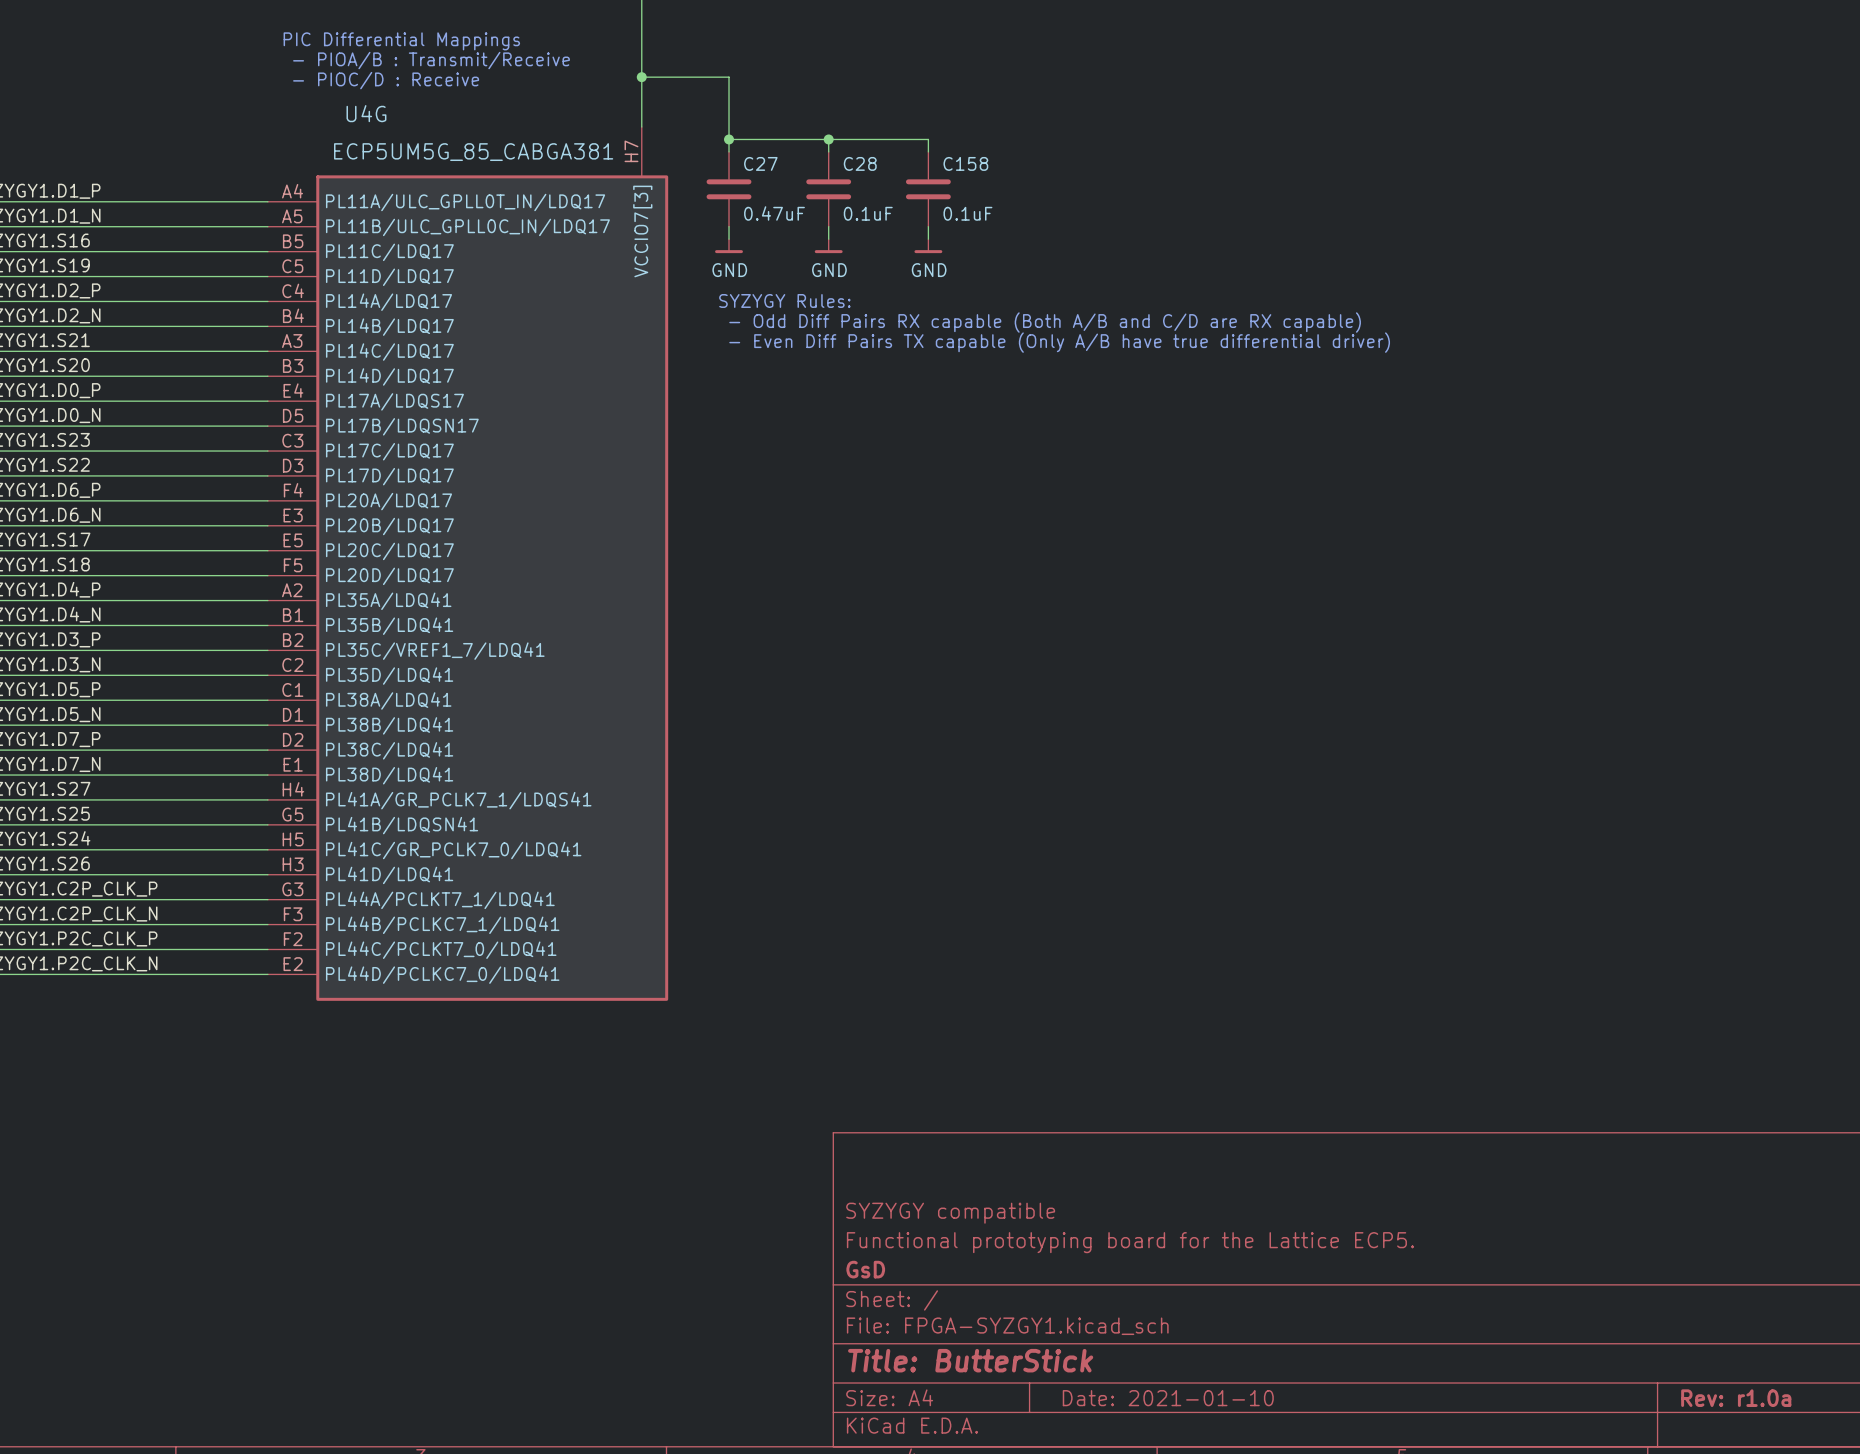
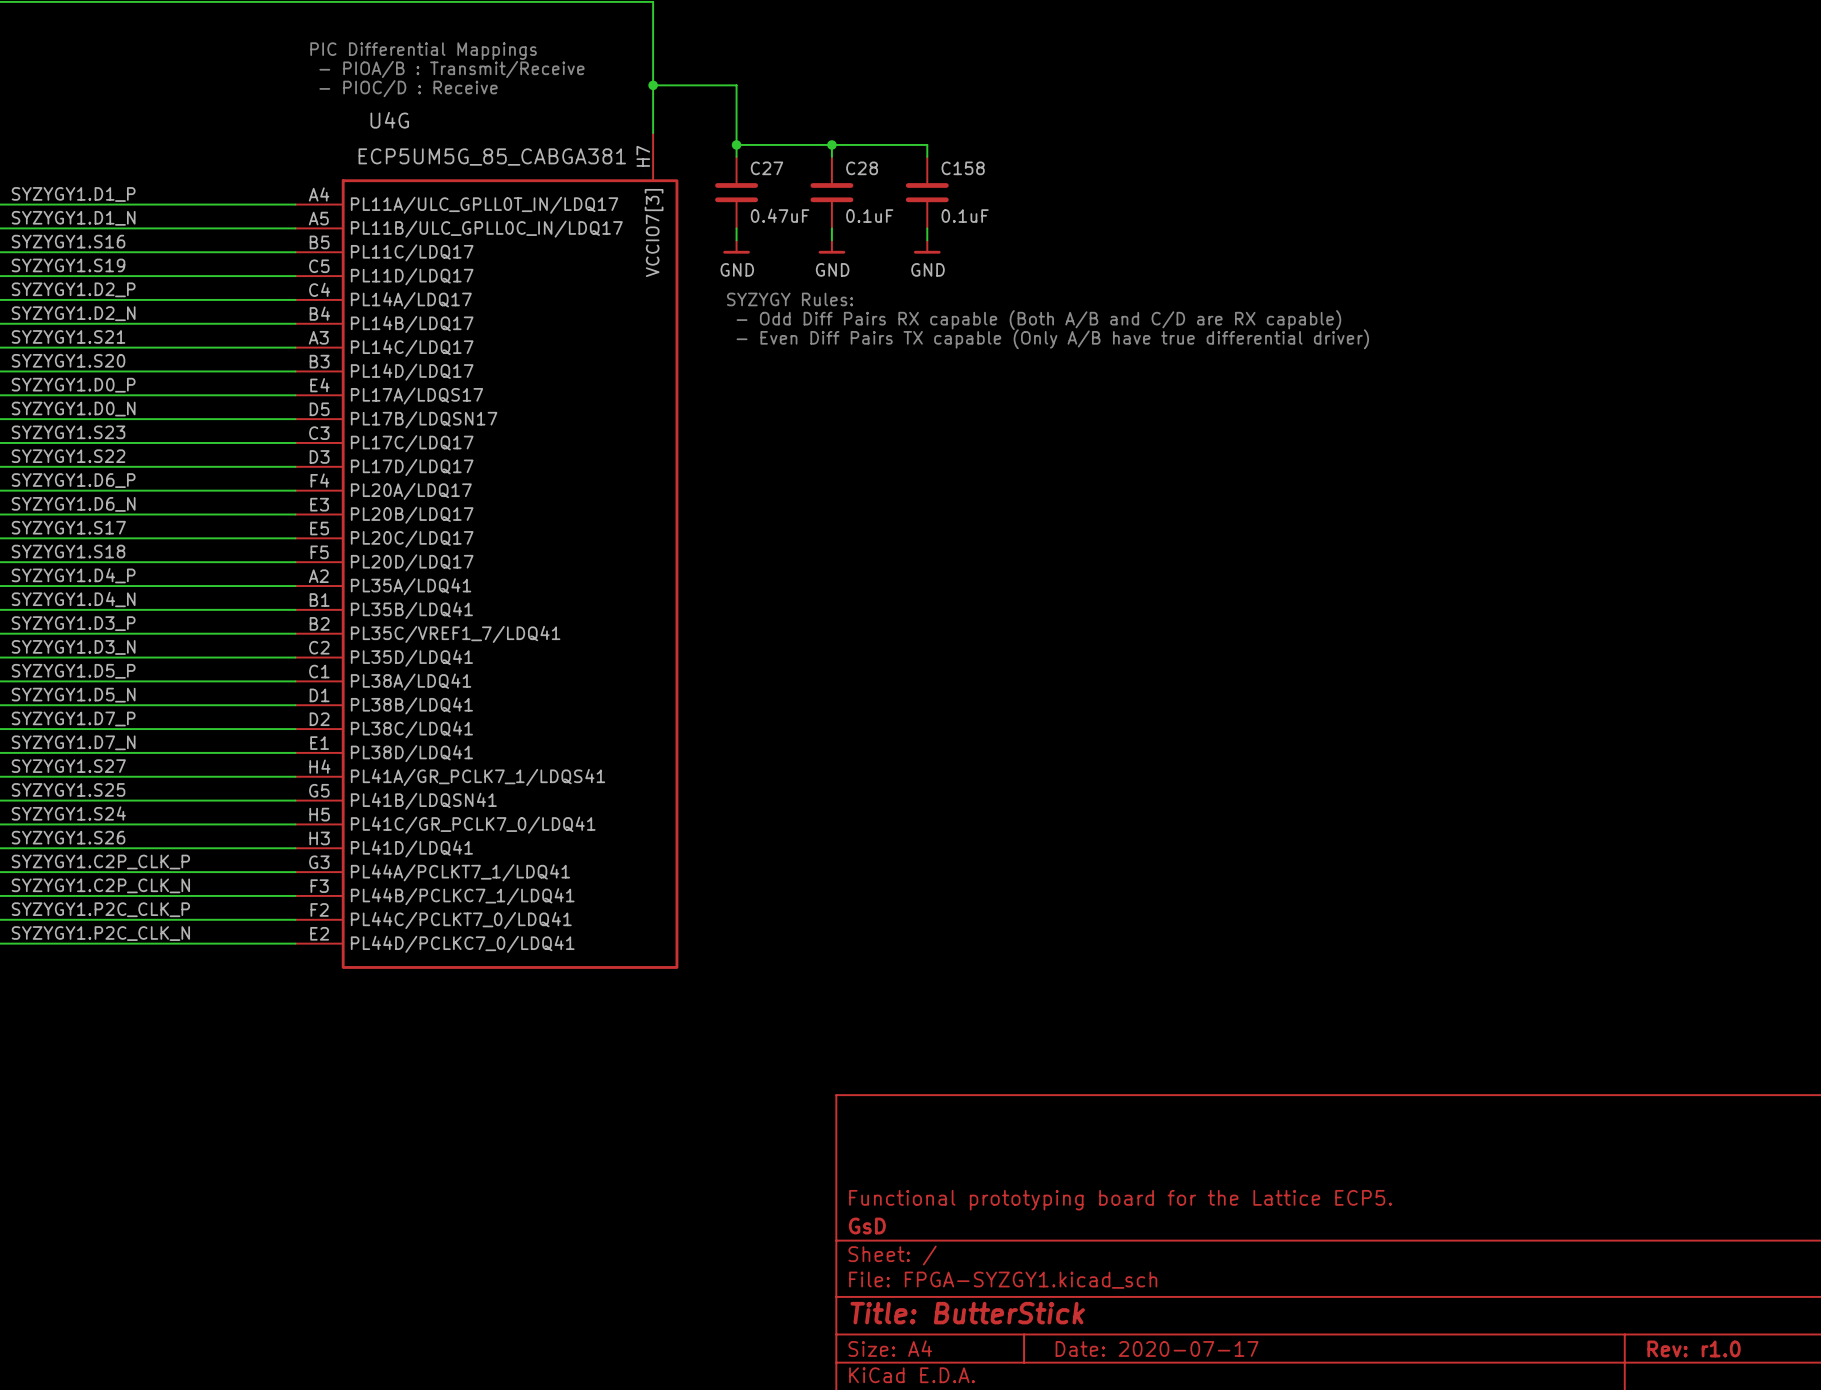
title block: SYZYGY compatible (950, 1213) -> none
title block: Date: 2021-01-10 (1168, 1398) -> Date: 2020-07-17 (1157, 1348)
title block: Rev: r1.0a (1736, 1398) -> Rev: r1.0 (1694, 1348)

